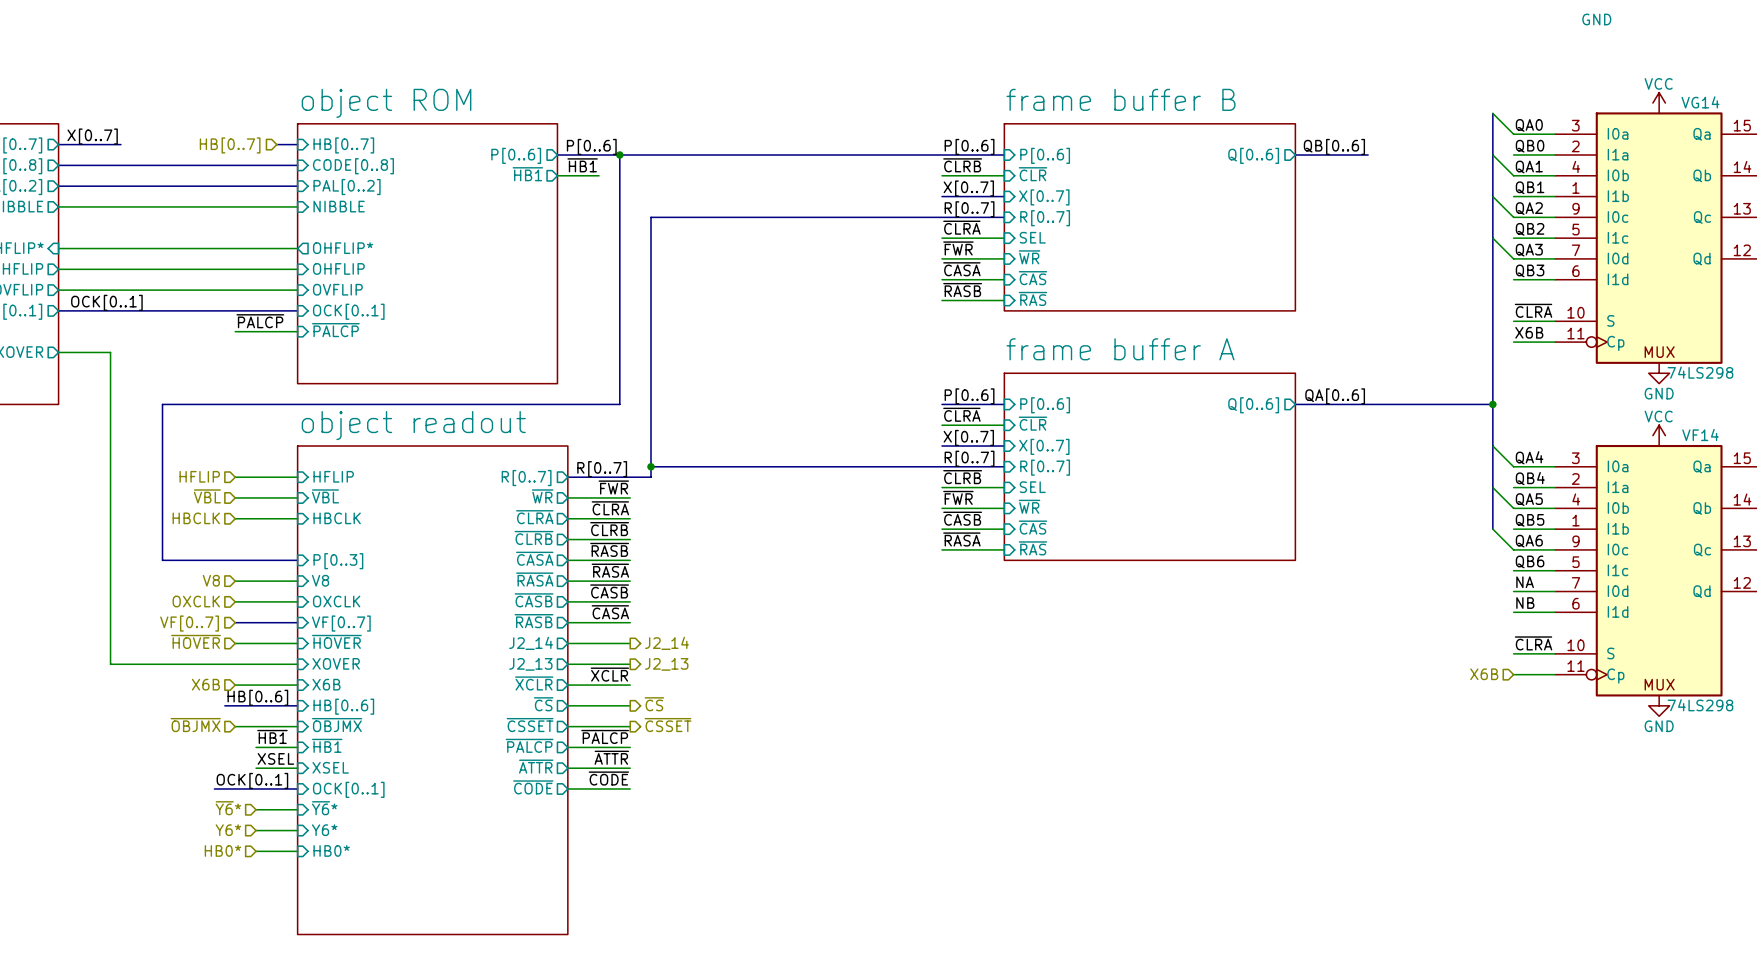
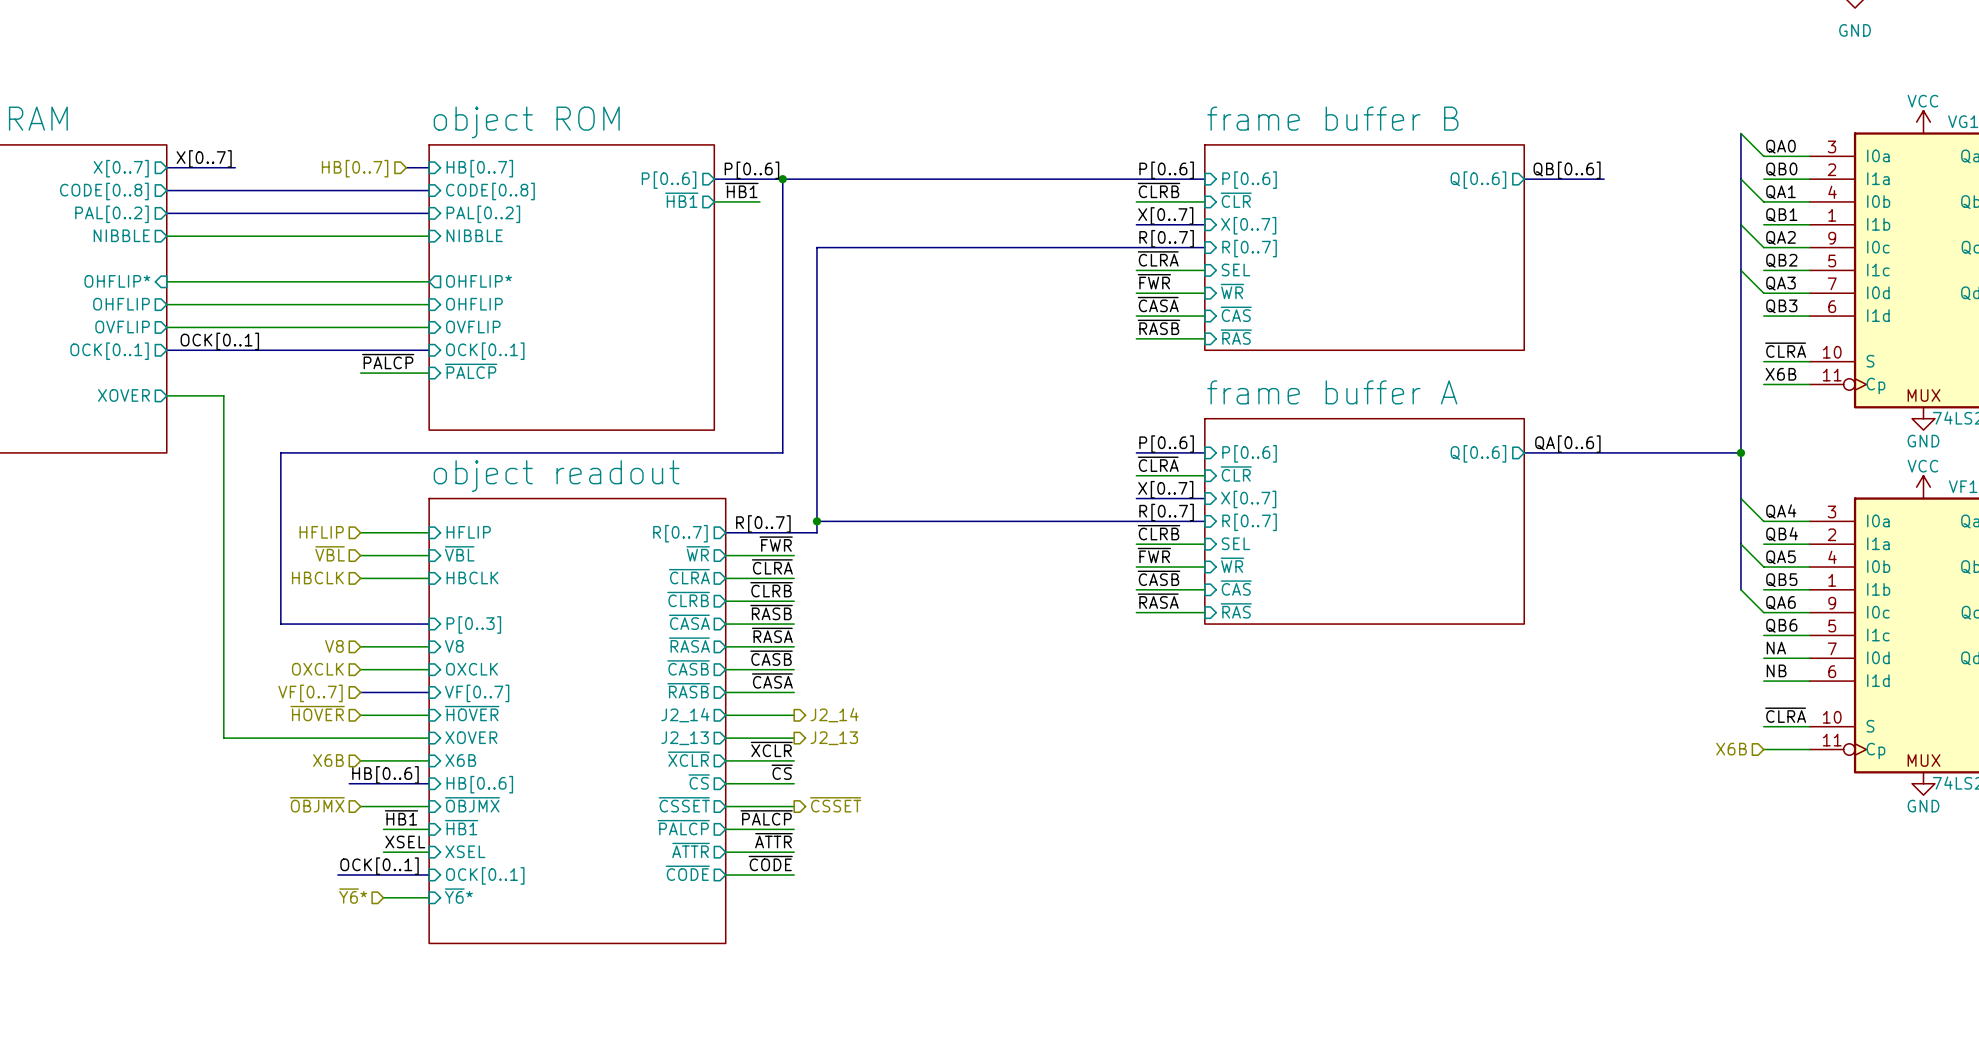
sheet object readout: none -> (577, 721)
sheet object readout: (432, 690) -> none
label: none -> ~{CS} (782, 772)
hierarchical label: ~{CS} (654, 704) -> none
hierarchical label: Y6* (228, 830) -> none
wire: (256, 830) (297, 830) -> none
sheet pin: Y6* (324, 830) -> none
hierarchical label: HB0* (222, 850) -> none
sheet pin: HB0* (331, 850) -> none
wire: (256, 851) (297, 851) -> none

